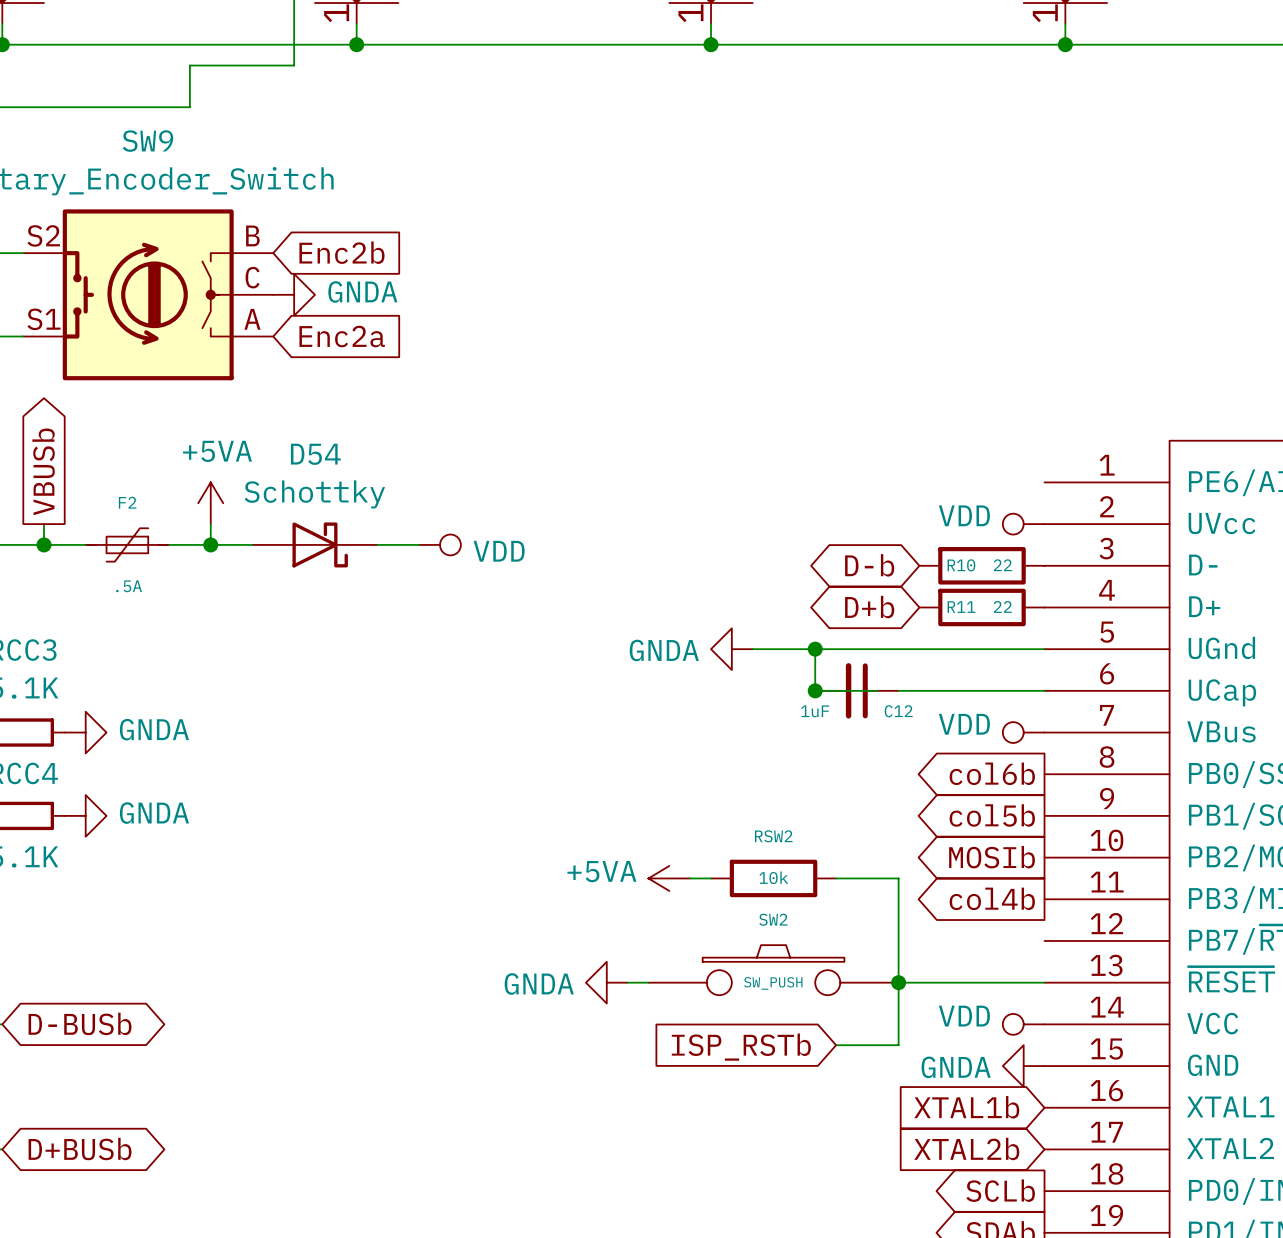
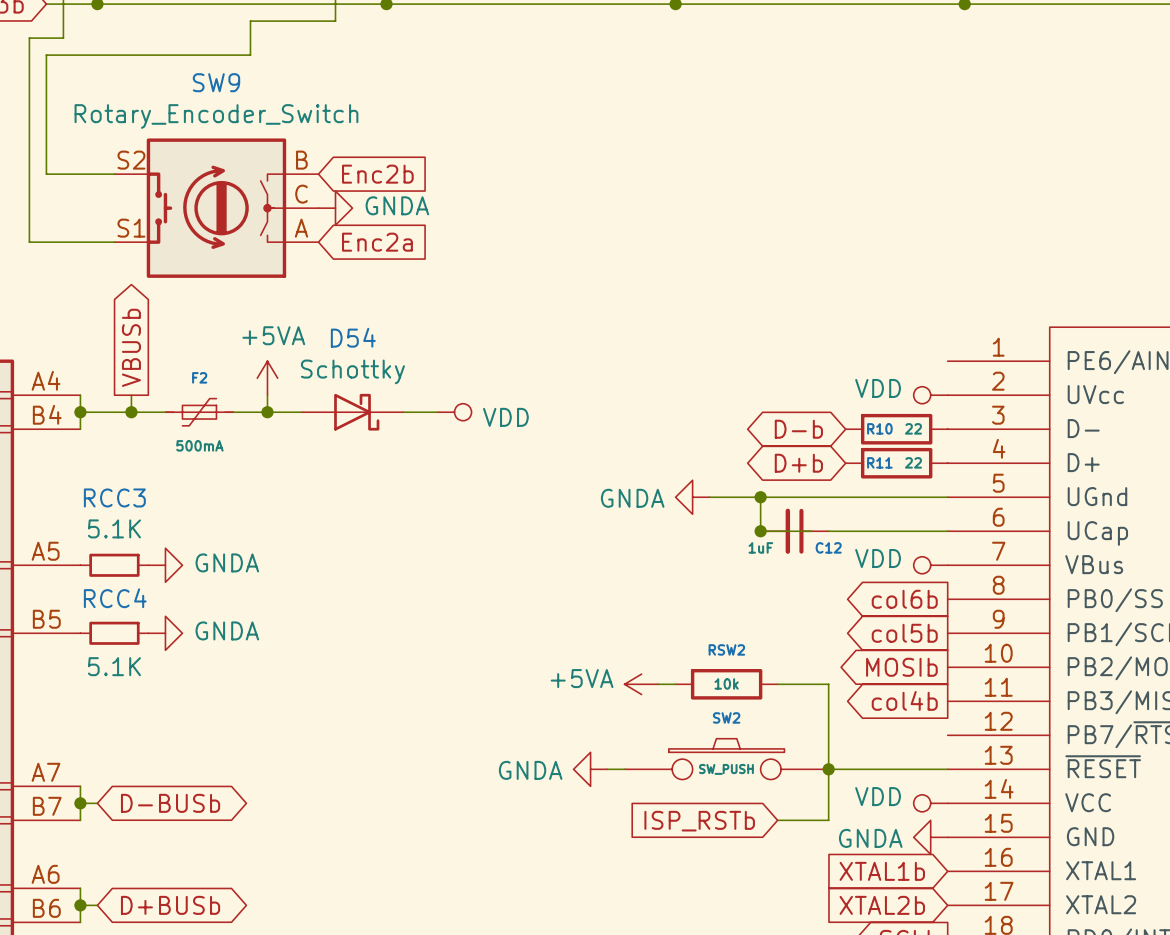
F2 value: .5A (129, 586) -> 500mA (199, 445)

